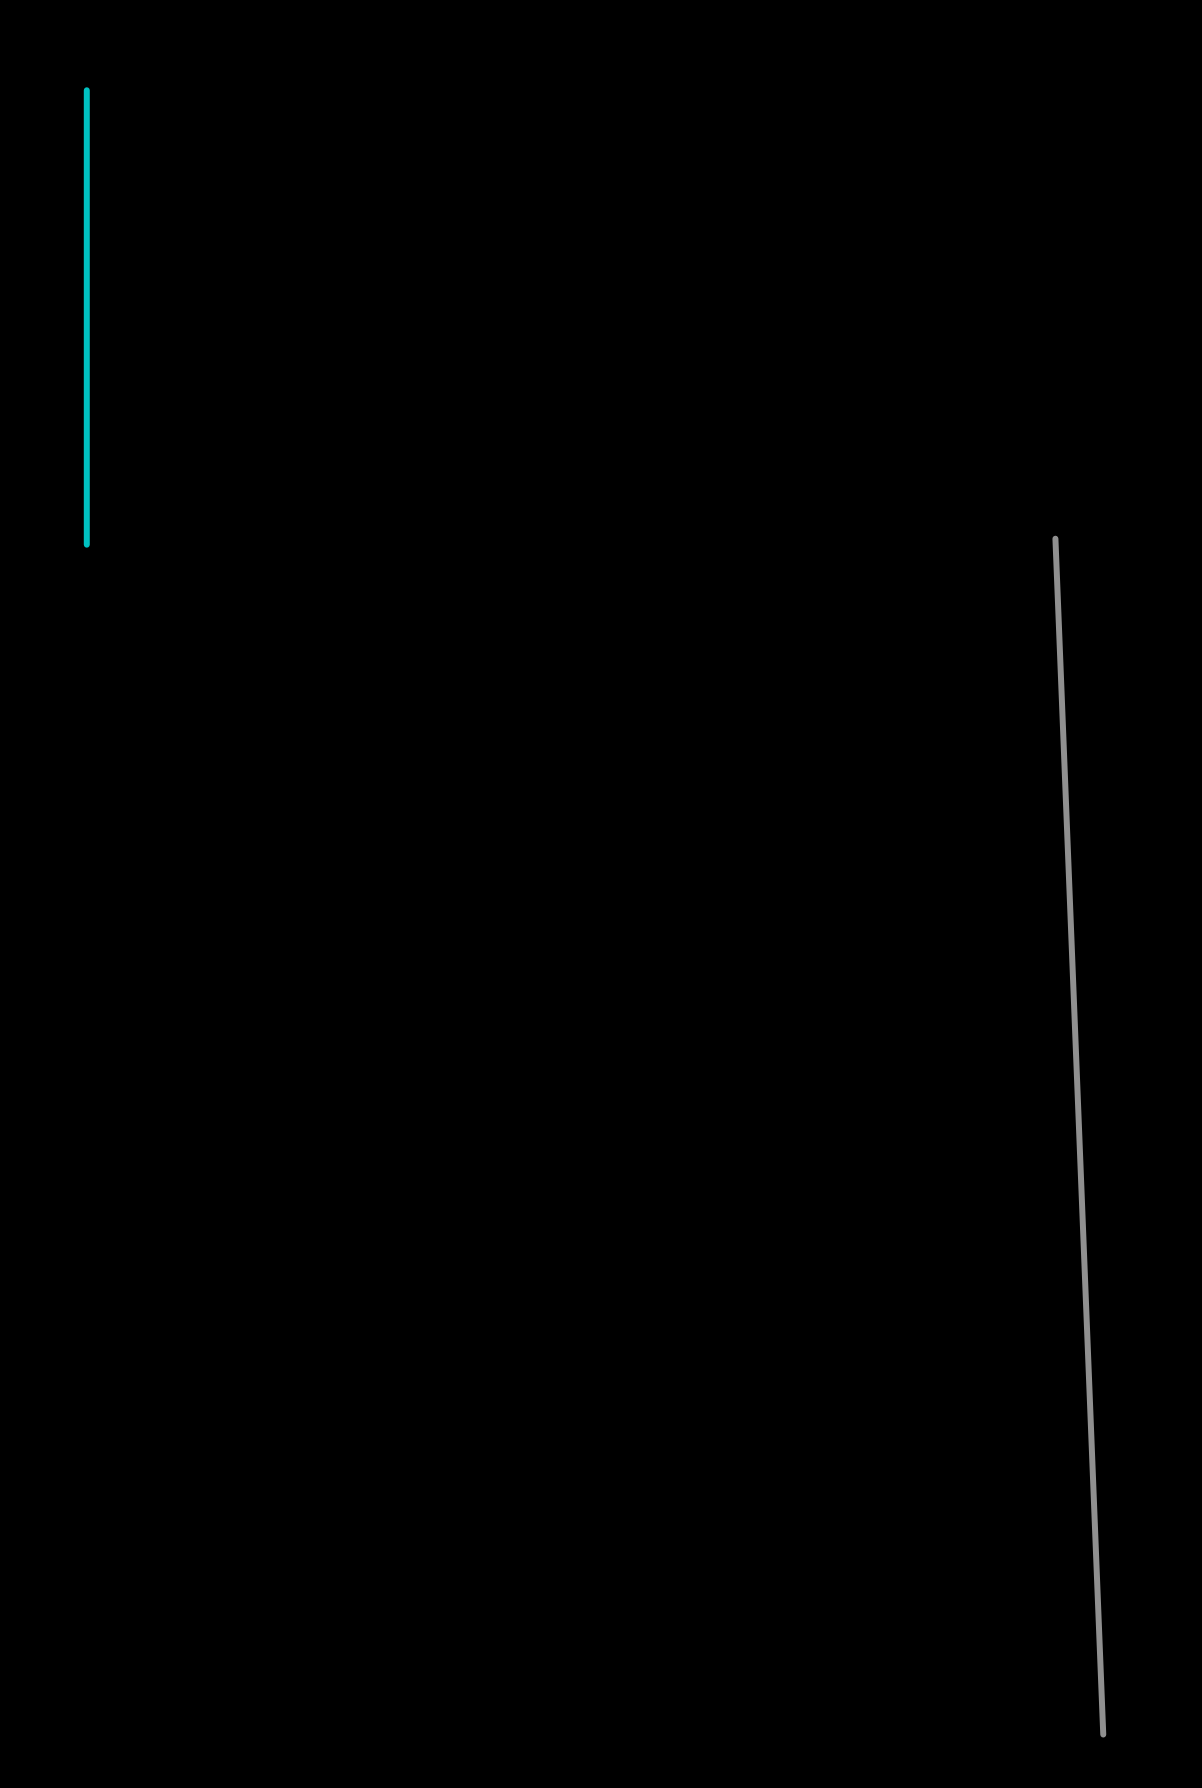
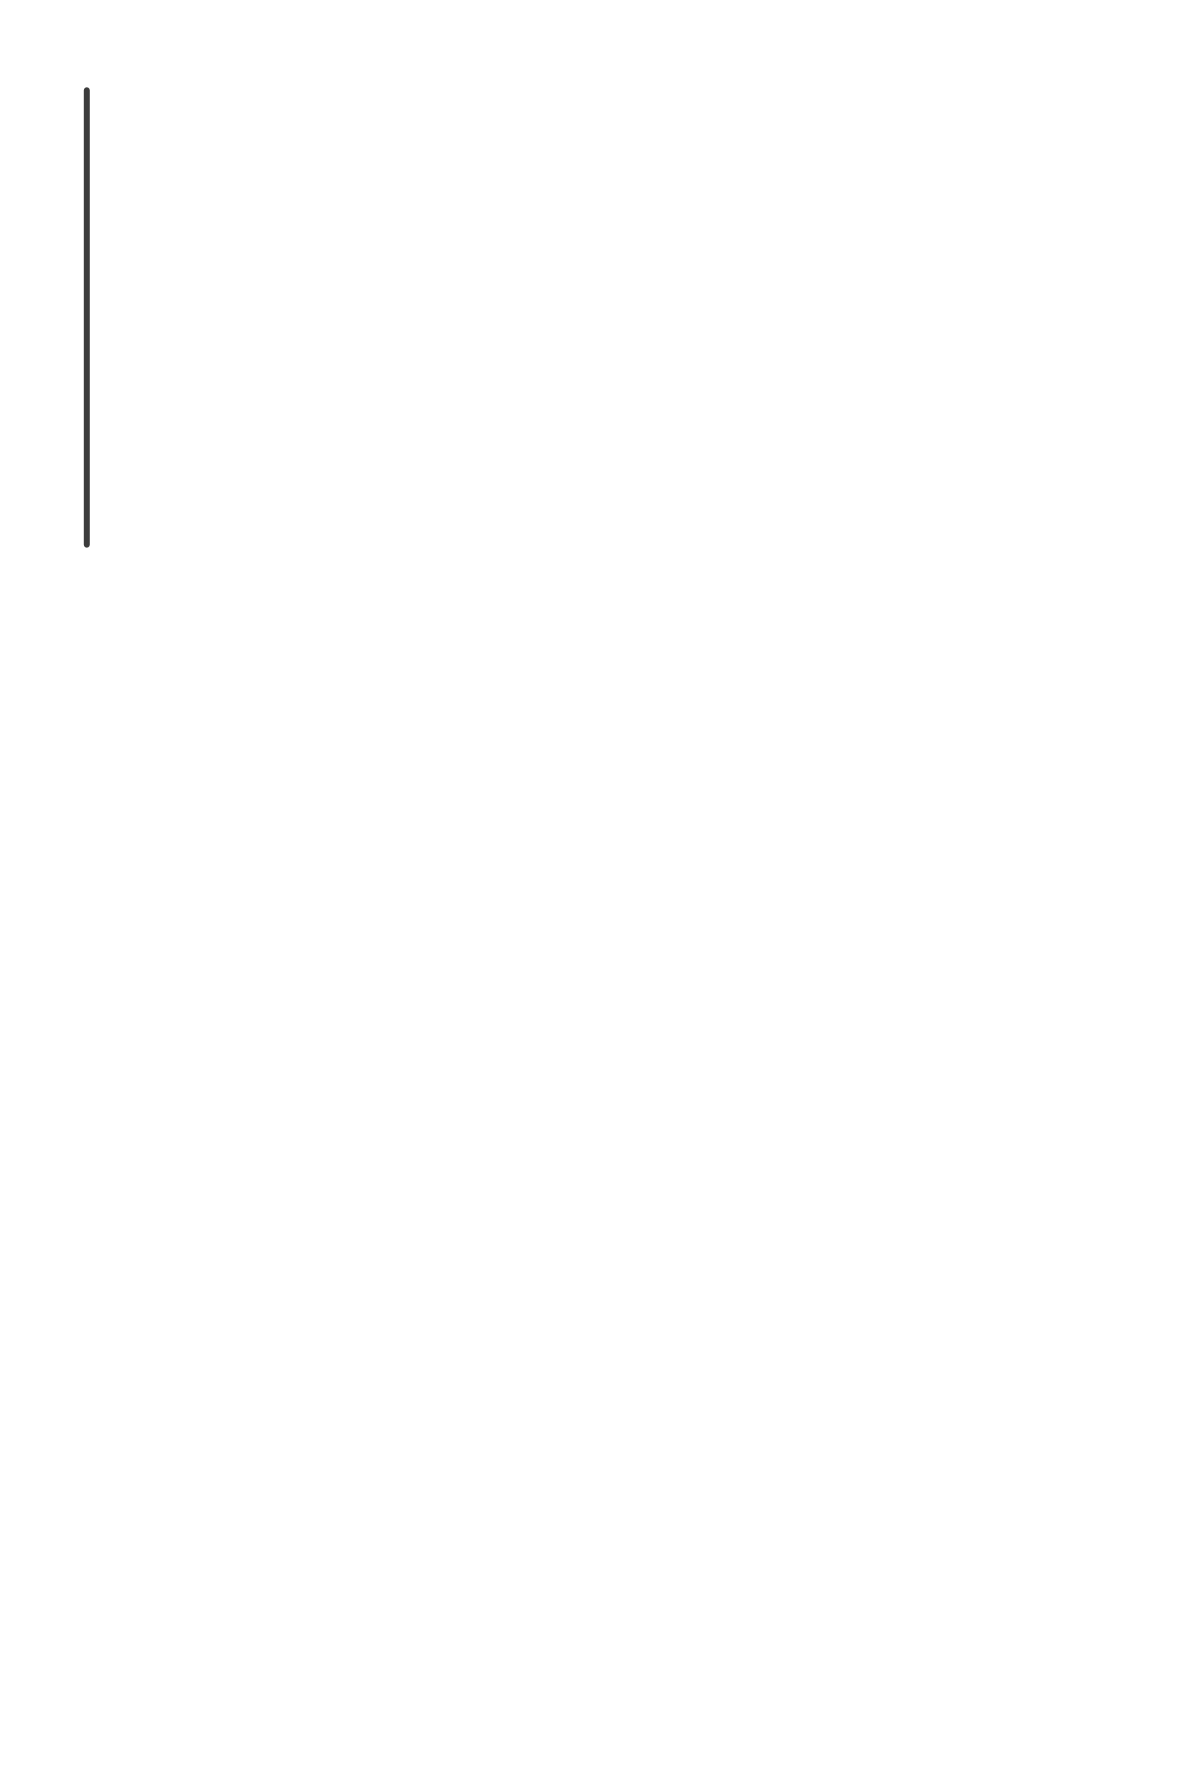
line: (1055, 538) (1103, 1734) -> none

